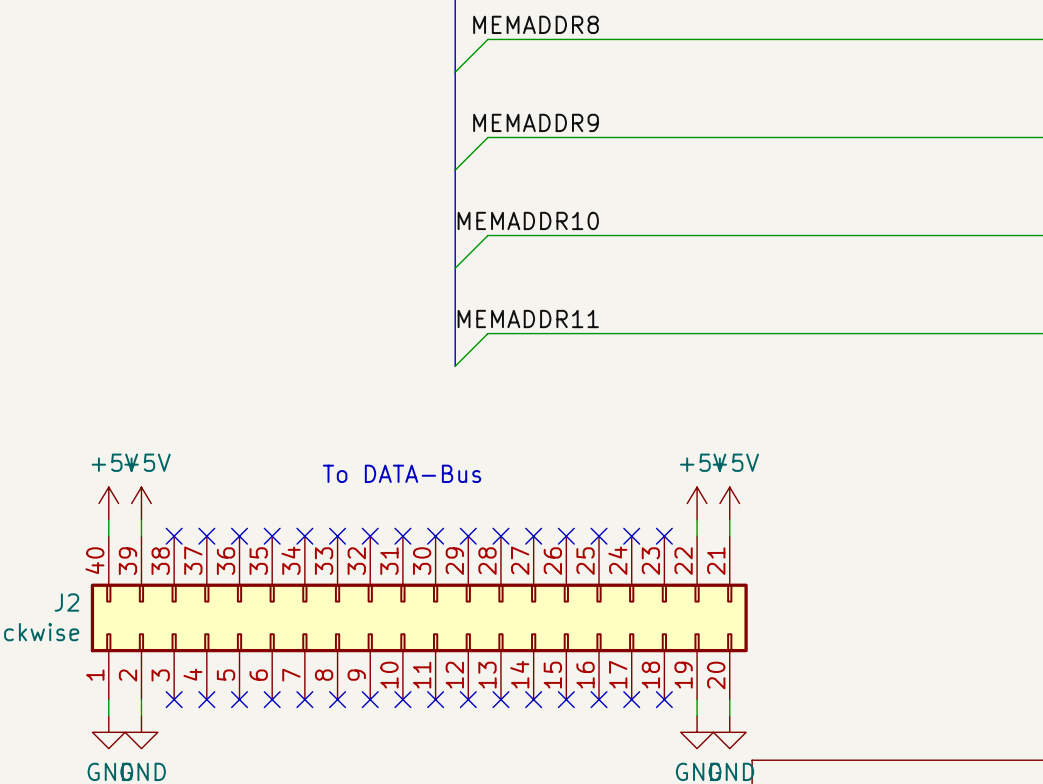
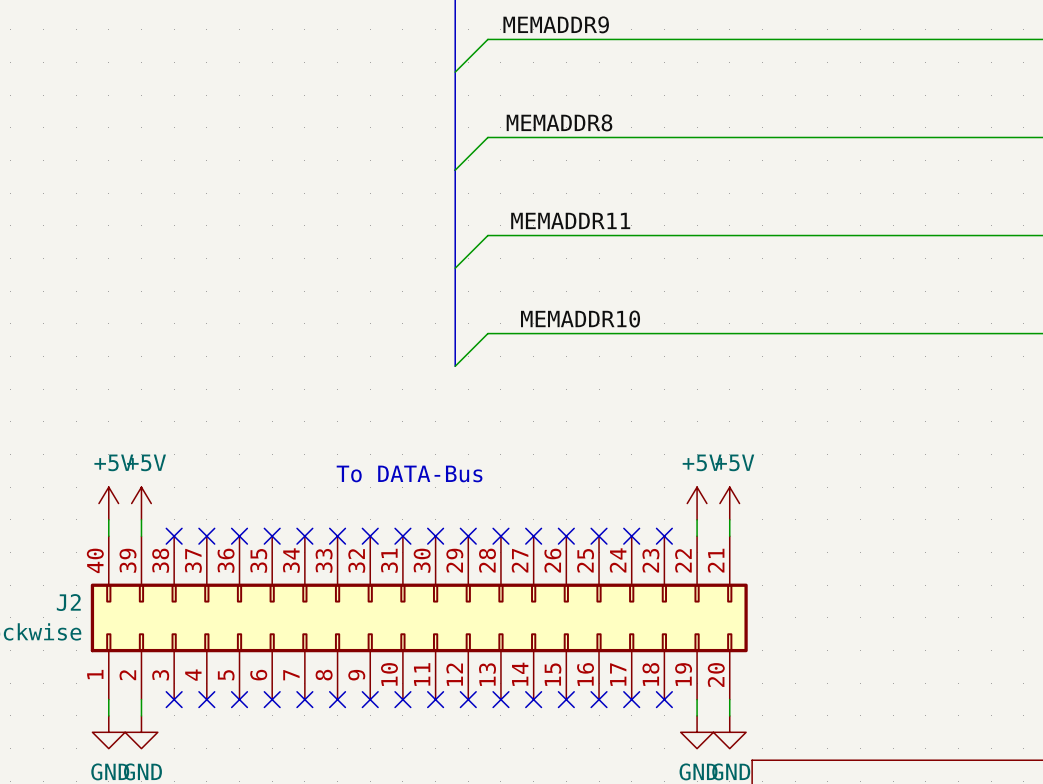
label: MEMADDR8 (536, 24) -> MEMADDR9 (556, 24)
label: MEMADDR9 (536, 122) -> MEMADDR8 (559, 122)
label position: MEMADDR10 (528, 220) -> MEMADDR10 (580, 319)
label position: MEMADDR11 (528, 319) -> MEMADDR11 (570, 220)

